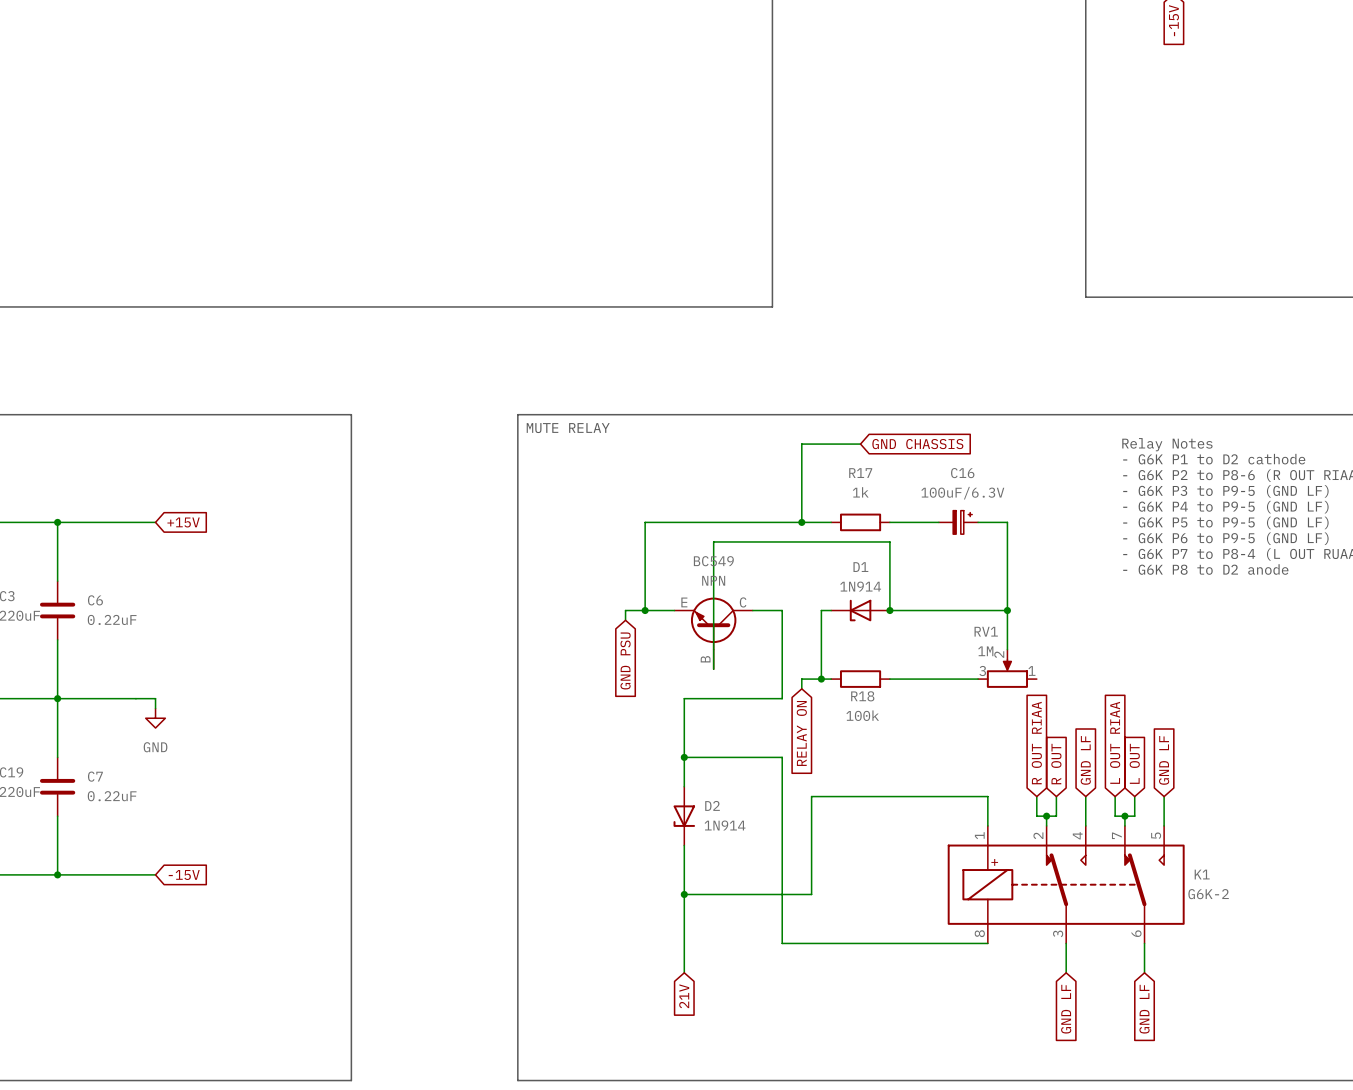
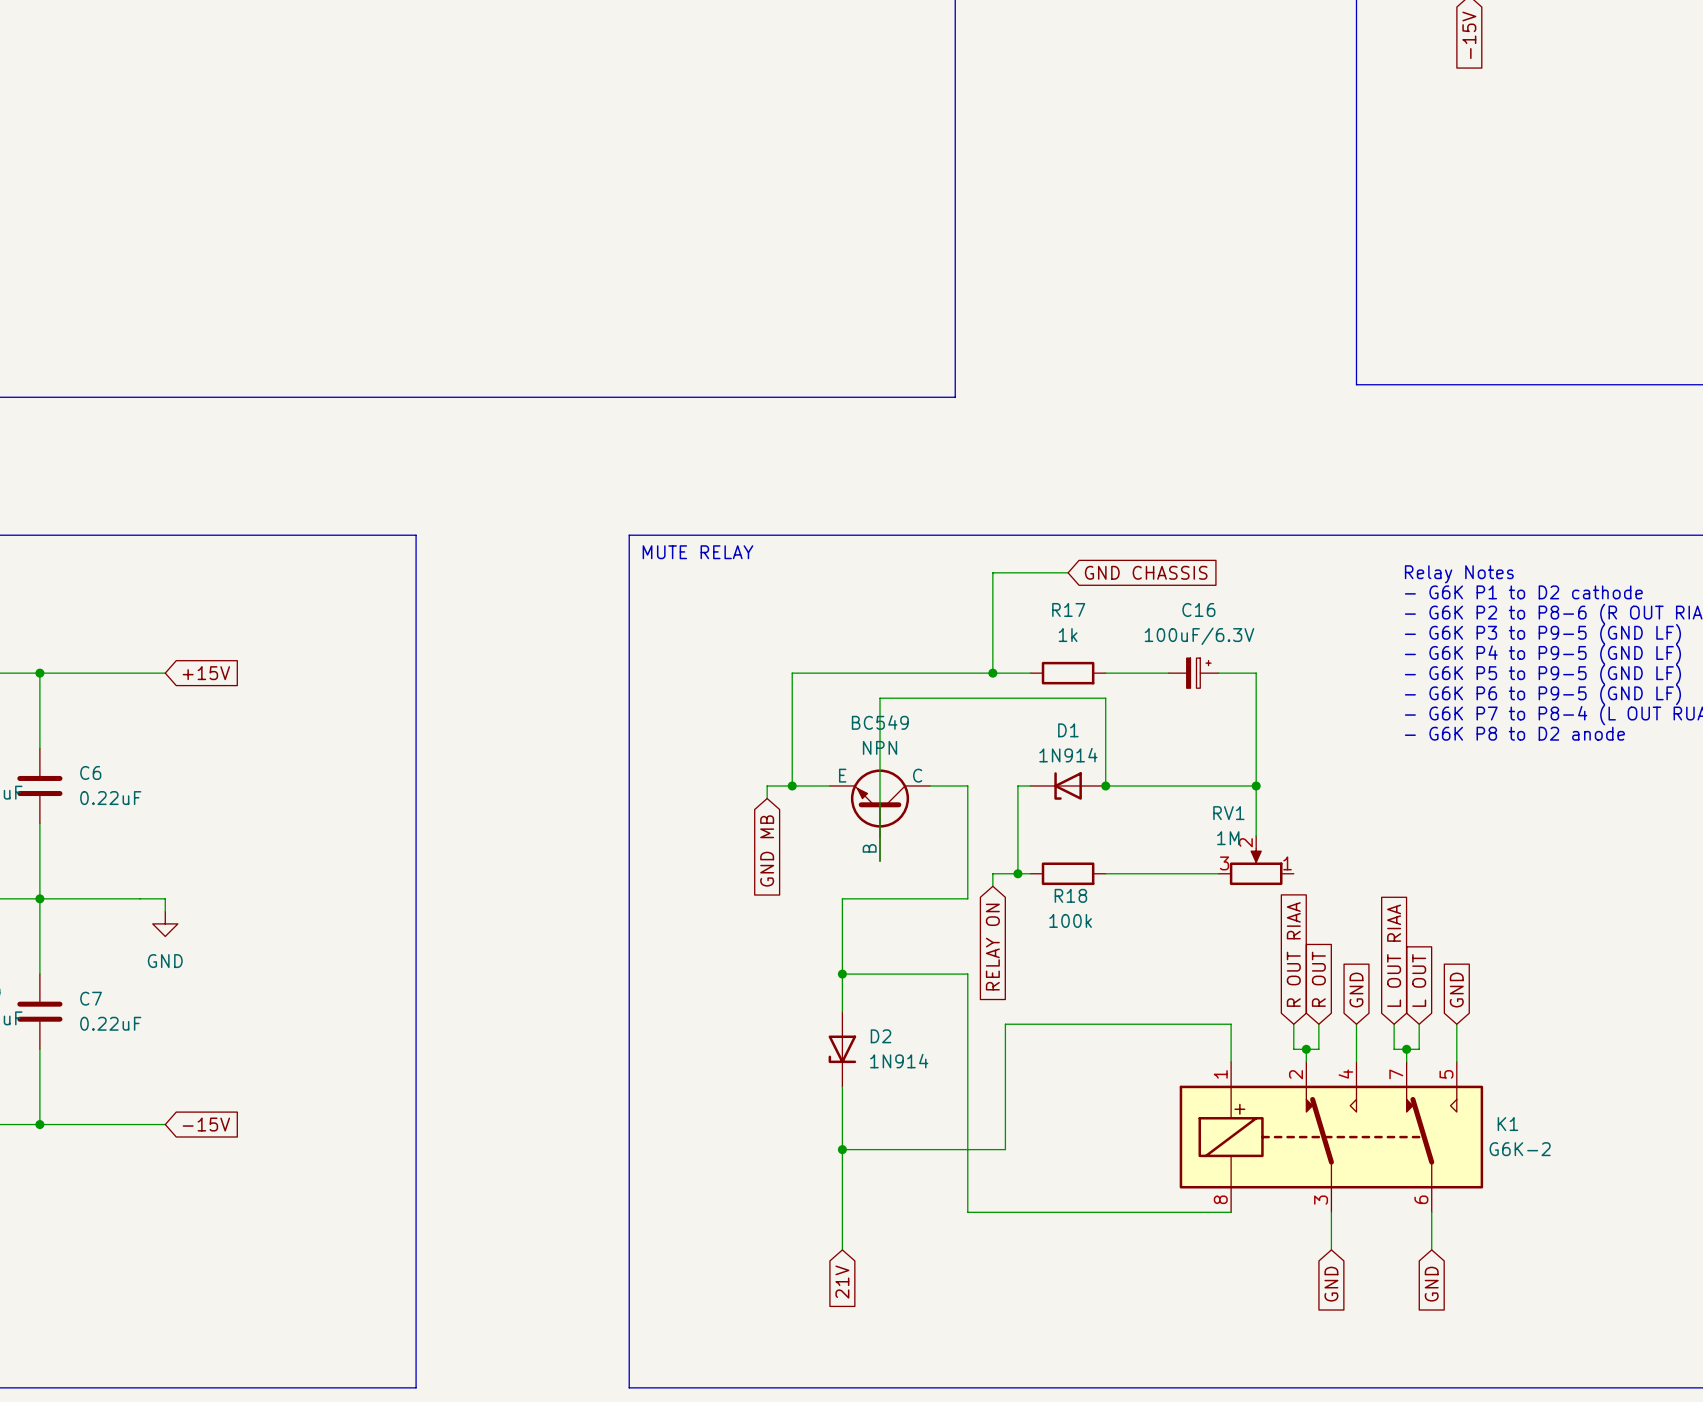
global label: GND PSU (625, 660) -> GND MB (767, 850)
global label: GND LF (1085, 760) -> GND (1356, 990)
global label: GND LF (1164, 760) -> GND (1456, 990)
global label: GND LF (1066, 1009) -> GND (1331, 1284)
global label: GND LF (1144, 1009) -> GND (1431, 1284)

